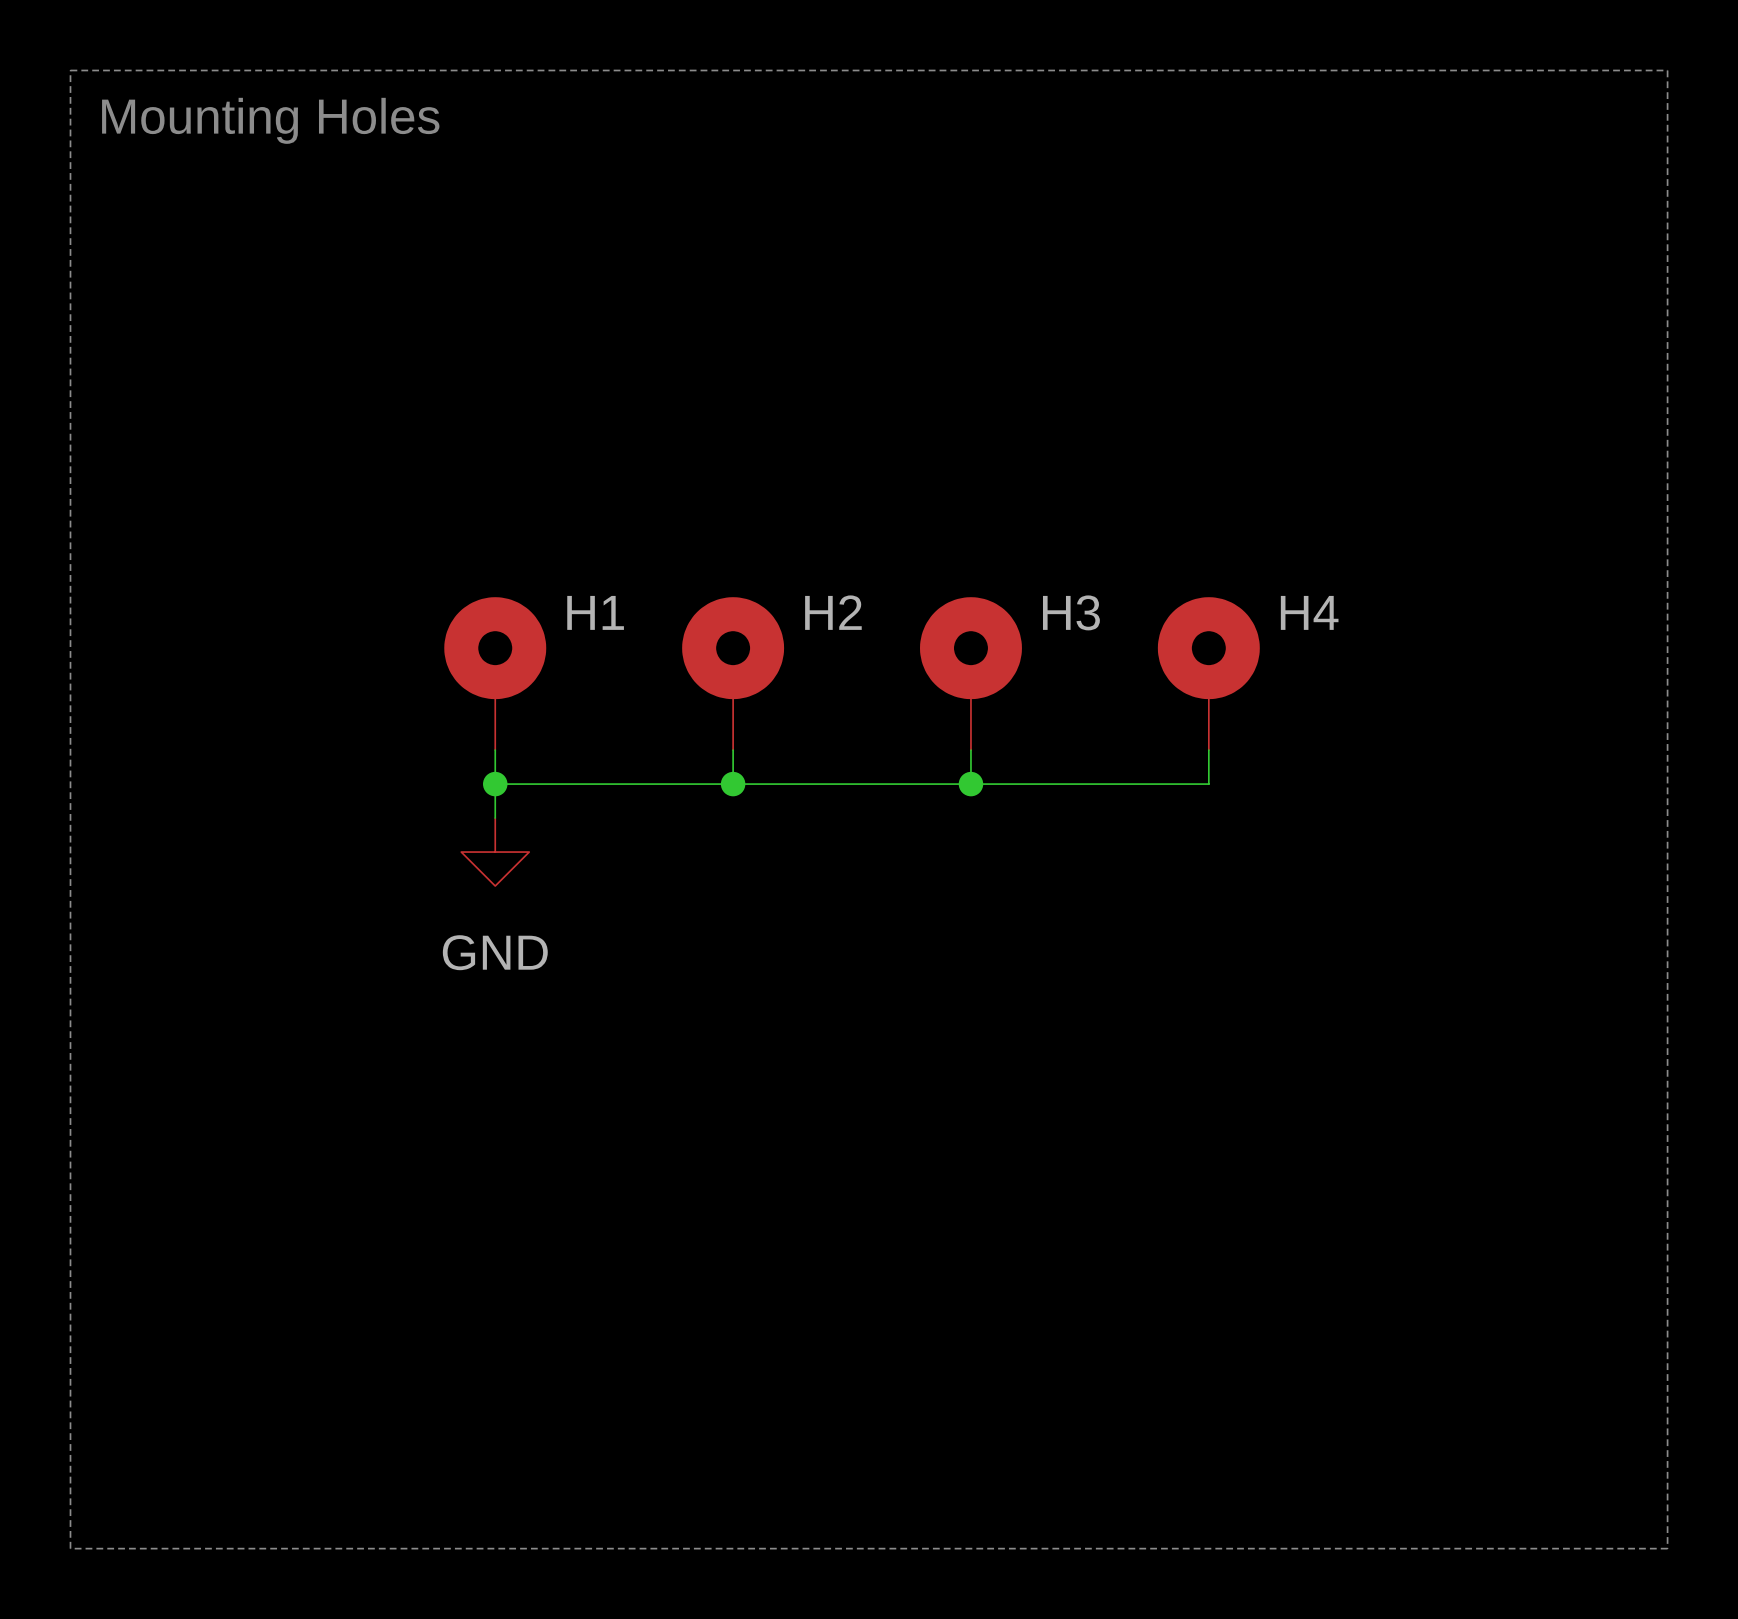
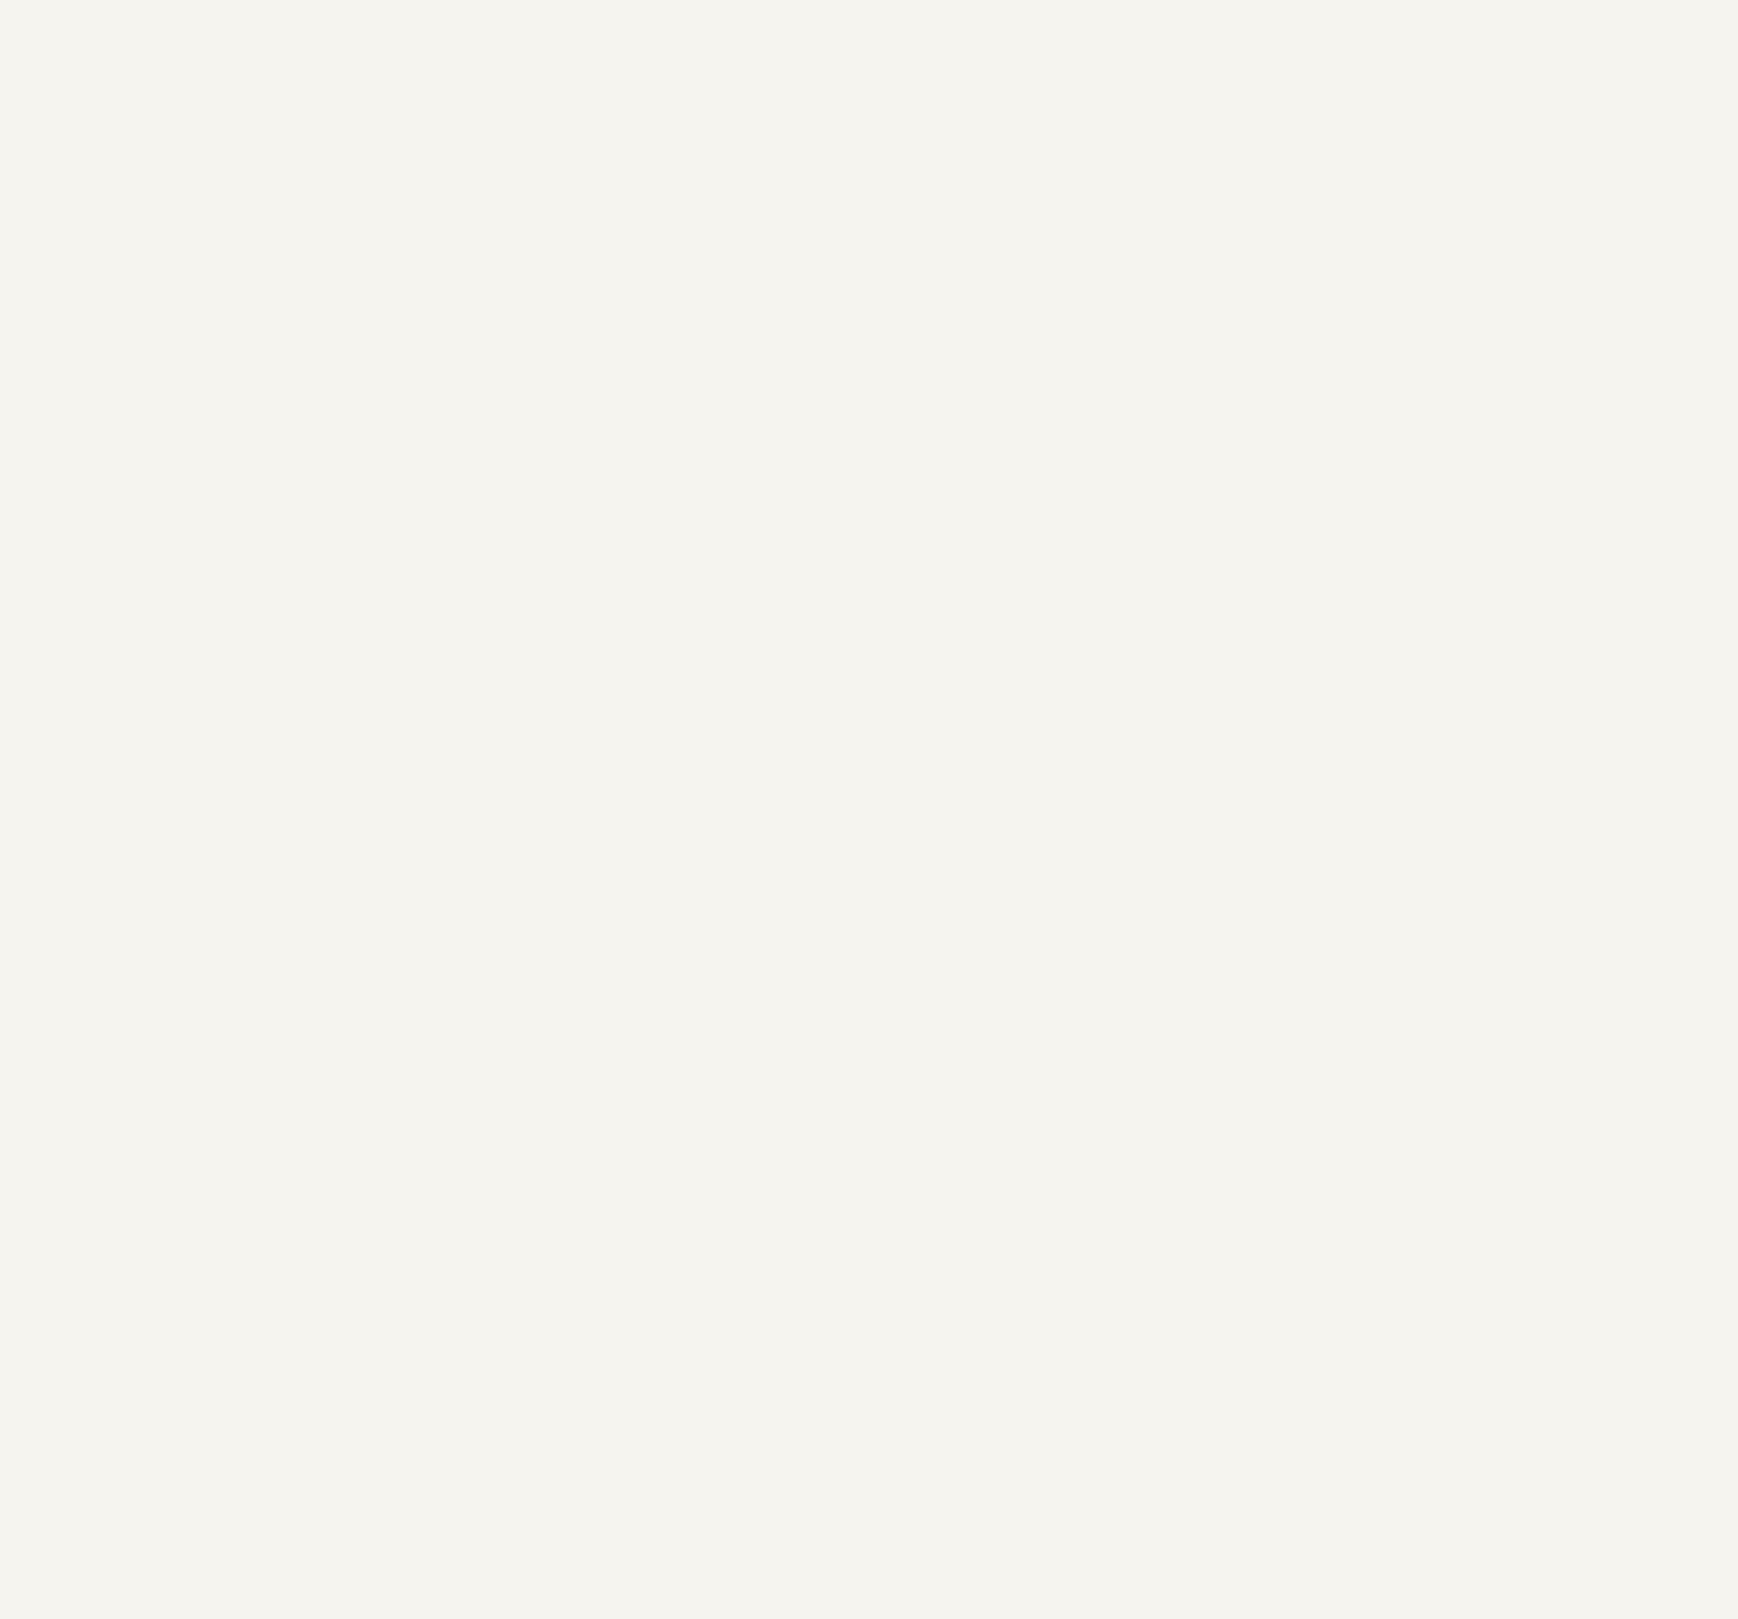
line: (70, 70) (1667, 70) (1667, 1548) (70, 1548) (70, 70) -> none
text: Mounting Holes (270, 120) -> none
H1: (495, 673) -> none
H2: (733, 673) -> none
H3: (970, 673) -> none
H4: (1208, 673) -> none
wire: (495, 750) (495, 818) -> none
wire: (733, 750) (733, 784) -> none
wire: (970, 750) (970, 784) -> none
wire: (1208, 750) (1208, 784) (495, 784) -> none
junction: (495, 784) -> none
junction: (733, 784) -> none
junction: (970, 784) -> none
power symbol: GND (495, 852) -> none

